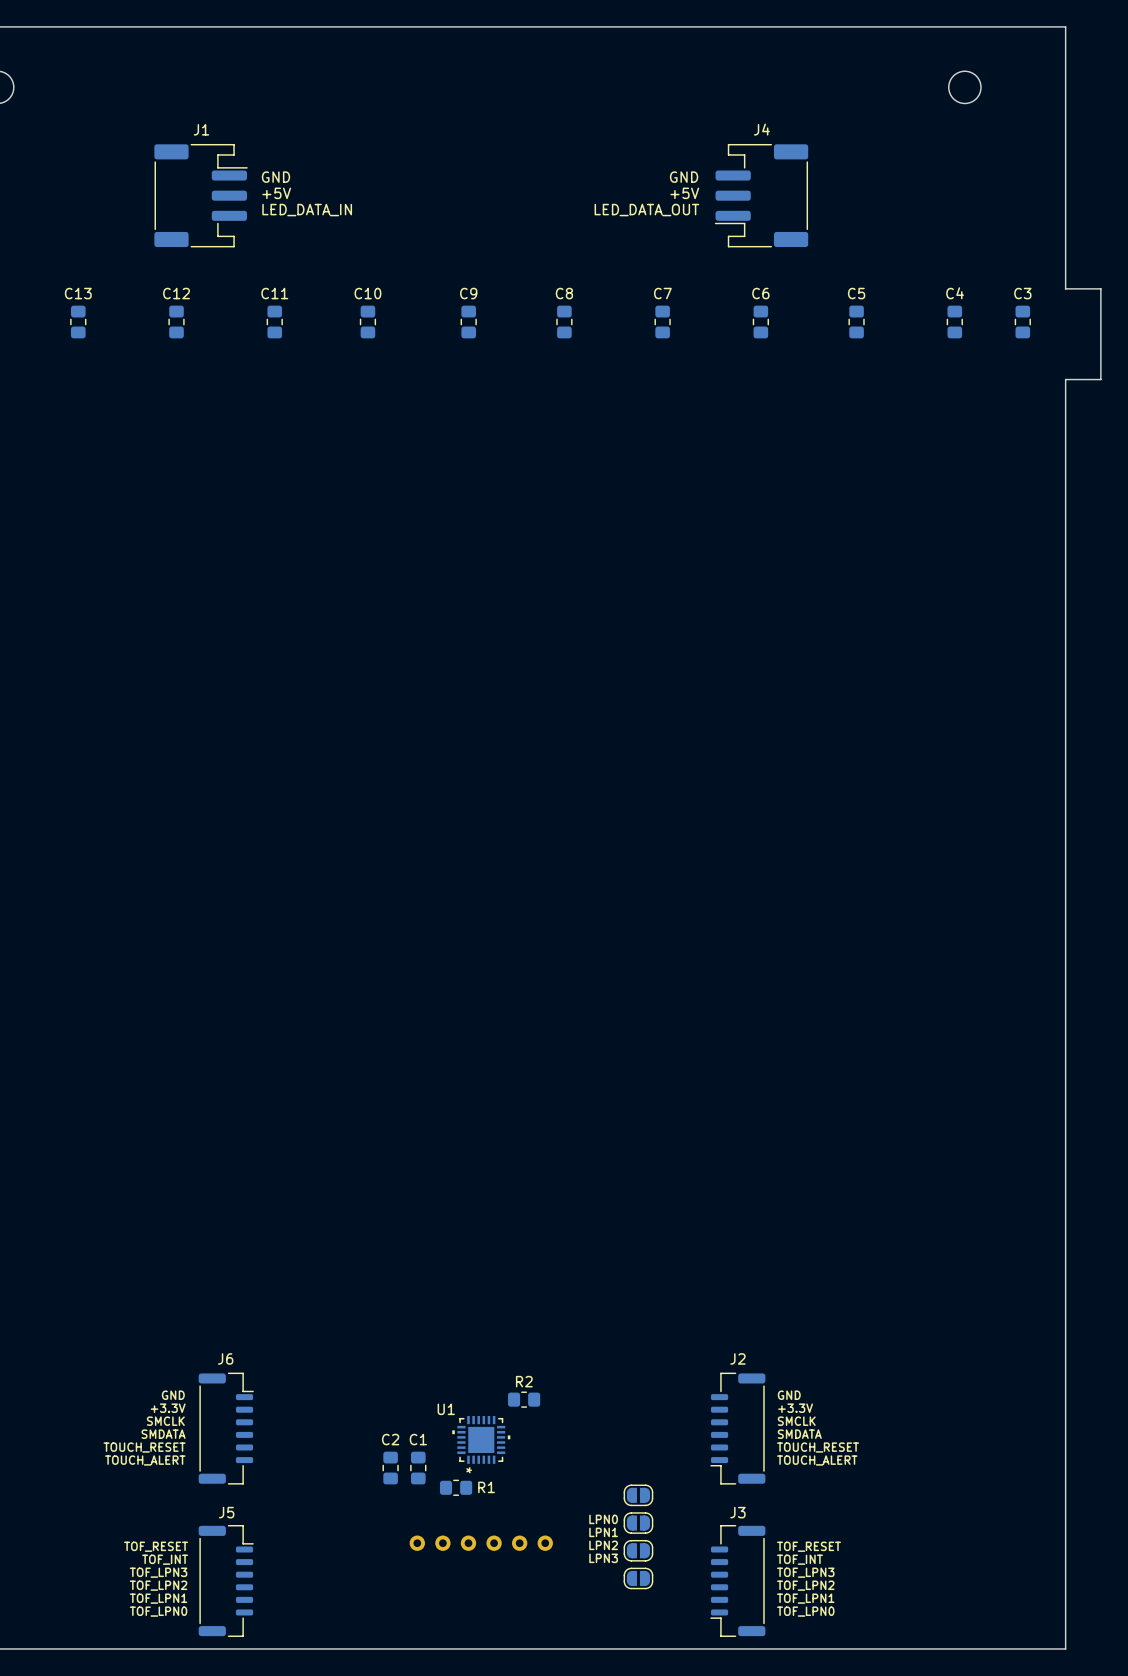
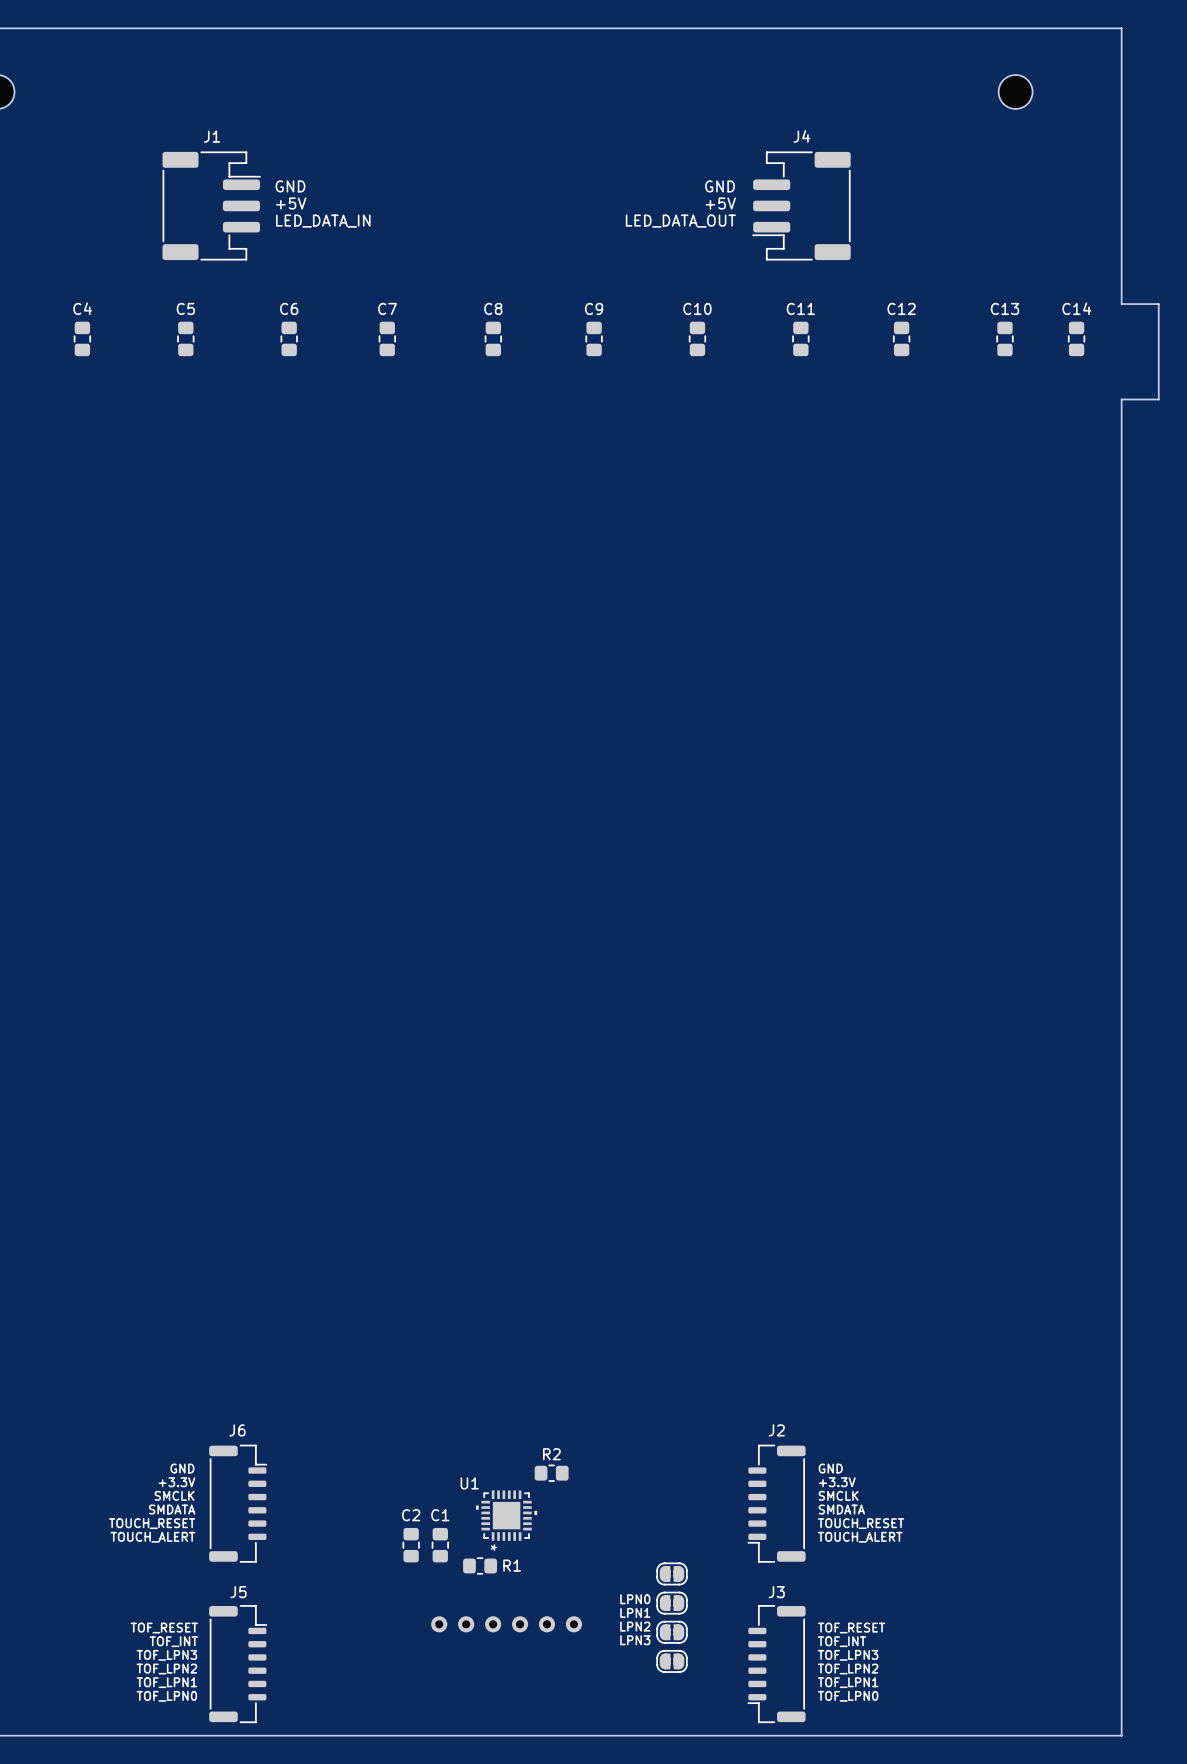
C13 name: C13 (78, 293) -> C4 (82, 308)
C12 name: C12 (176, 293) -> C5 (185, 308)
C11 name: C11 (274, 293) -> C6 (289, 308)
C10 name: C10 (367, 293) -> C7 (387, 308)
C9 name: C9 (468, 293) -> C8 (493, 308)
C8 name: C8 (564, 293) -> C9 (594, 308)
C7 name: C7 (662, 293) -> C10 (697, 308)
C6 name: C6 (760, 293) -> C11 (800, 308)
C5 name: C5 (856, 293) -> C12 (901, 308)
C4 name: C4 (955, 293) -> C13 (1004, 308)
C3 name: C3 (1022, 293) -> C14 (1076, 308)

